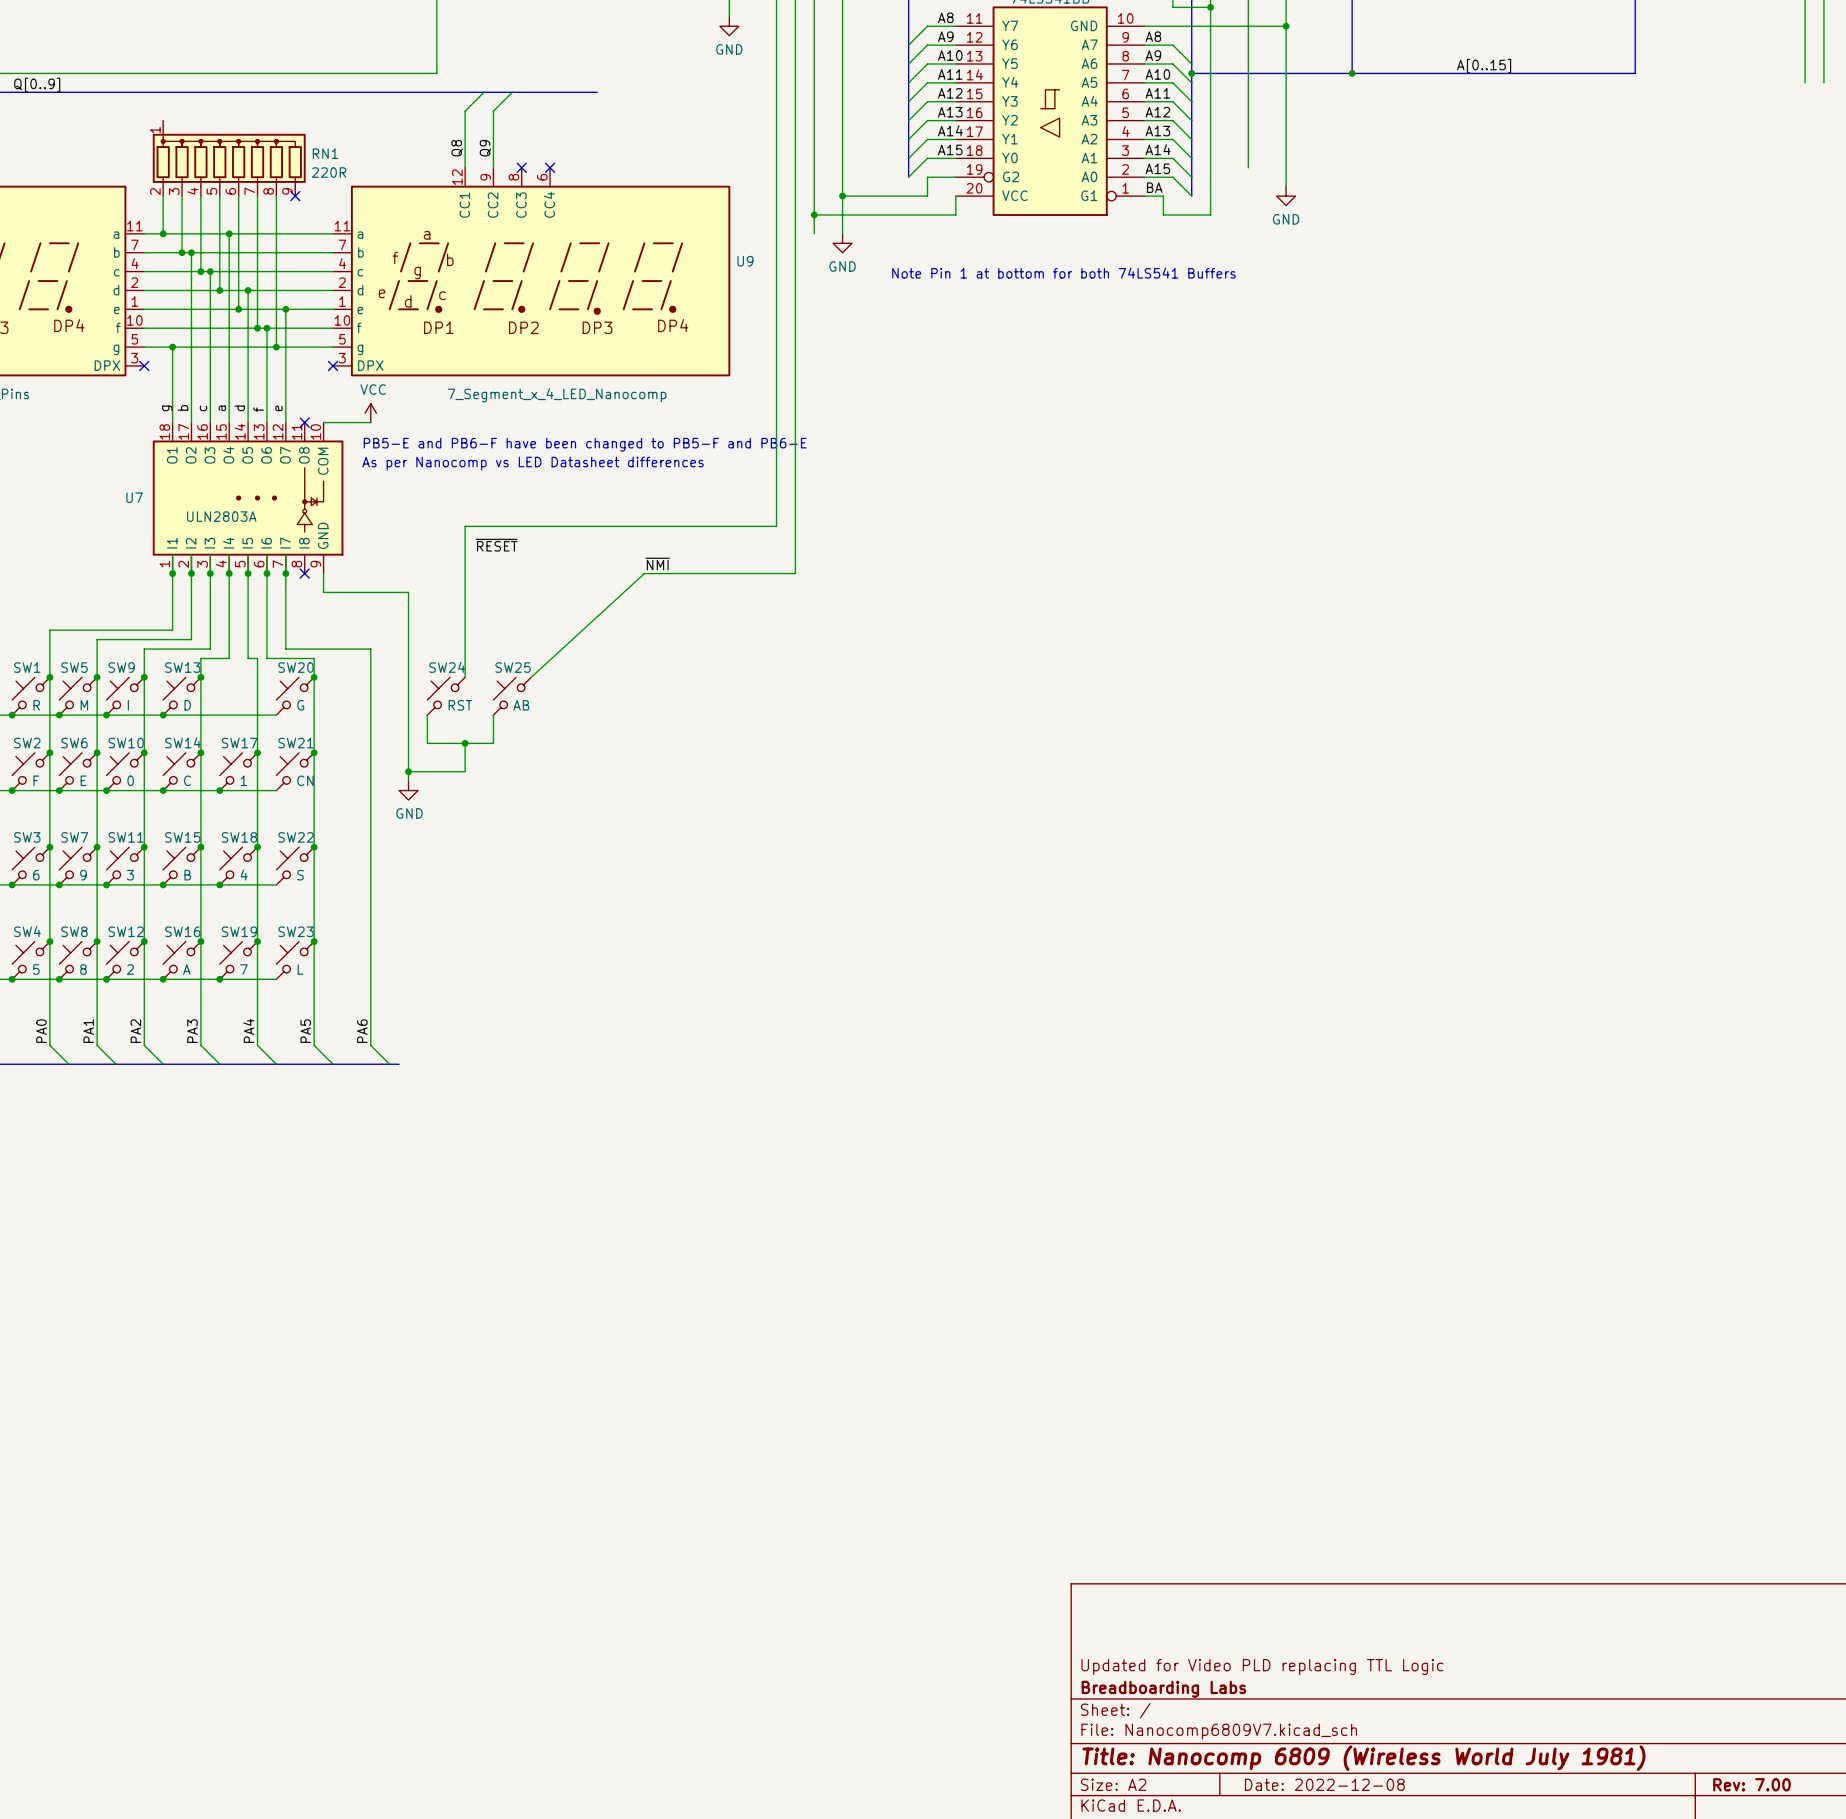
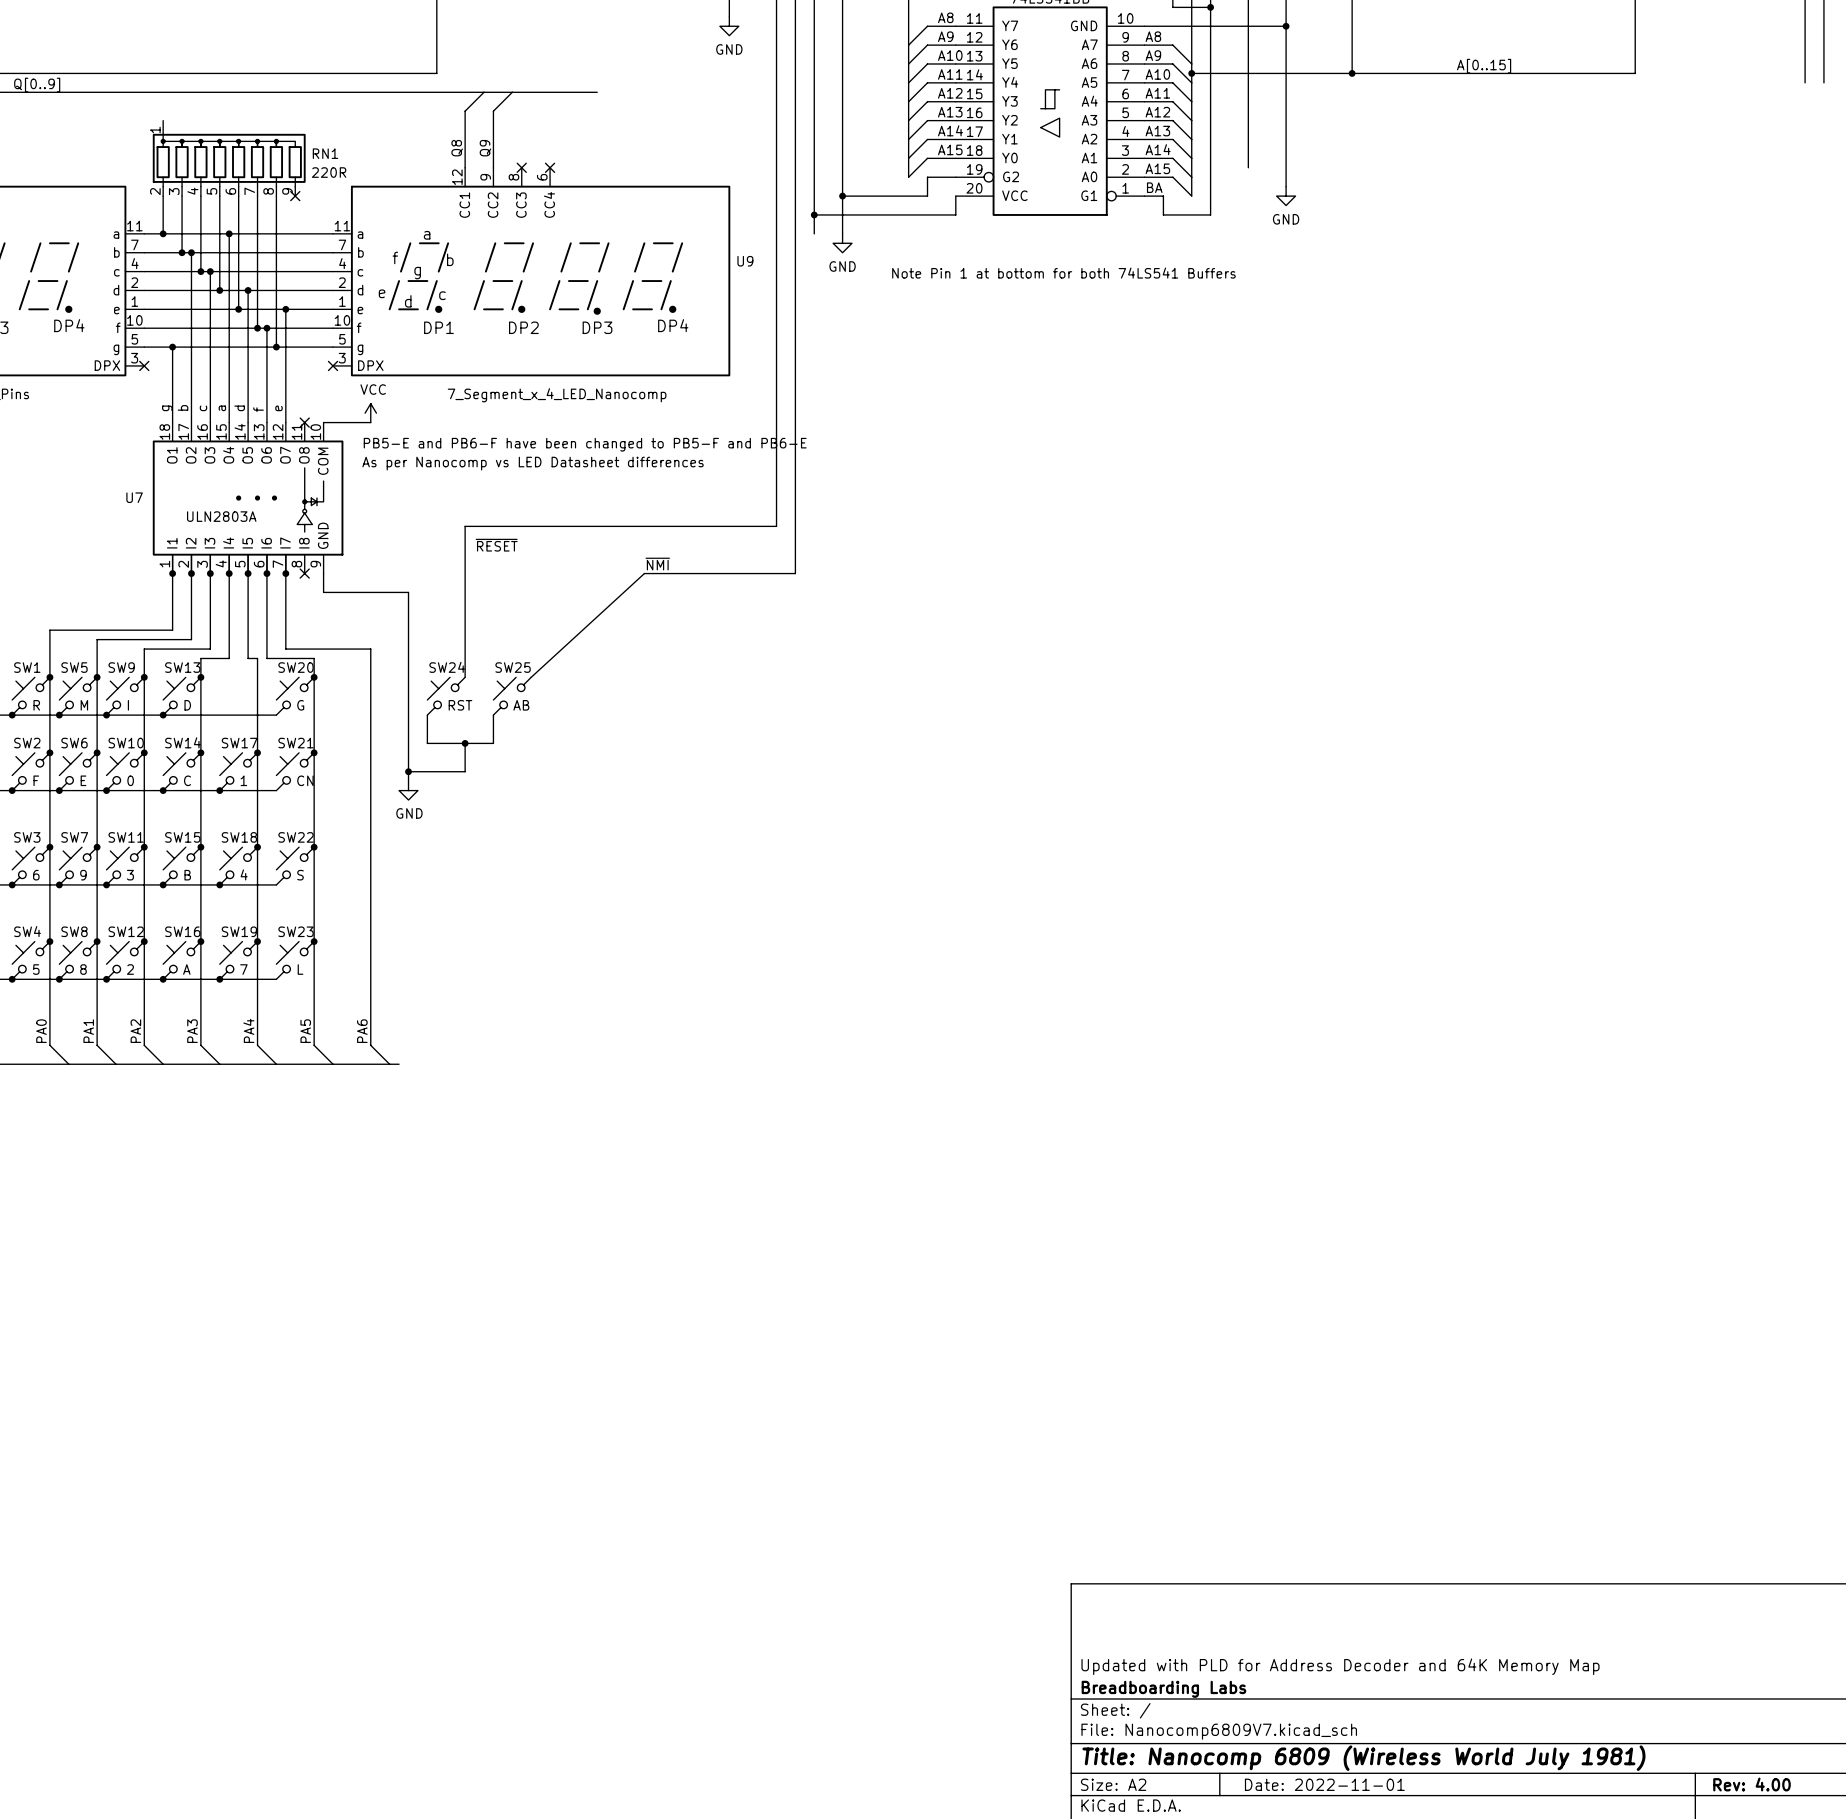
title block: Updated for Video PLD replacing TTL Logic (1262, 1667) -> Updated with PLD for Address Decoder and 64K Memory Map (1340, 1666)
title block: Date: 2022-12-08 (1324, 1784) -> Date: 2022-11-01 (1324, 1784)
title block: Rev: 7.00 (1752, 1784) -> Rev: 4.00 (1752, 1784)

